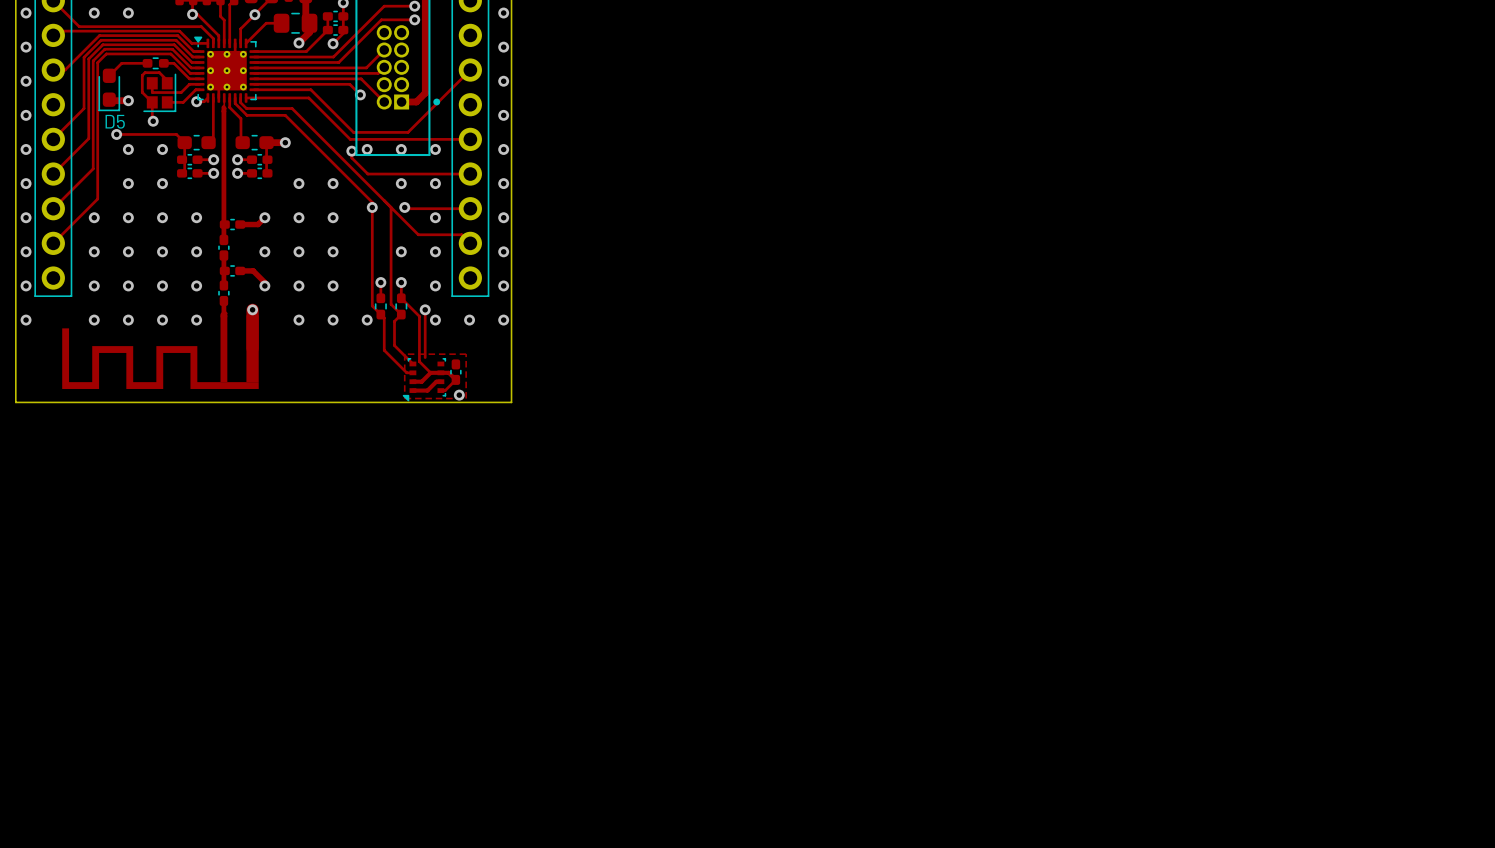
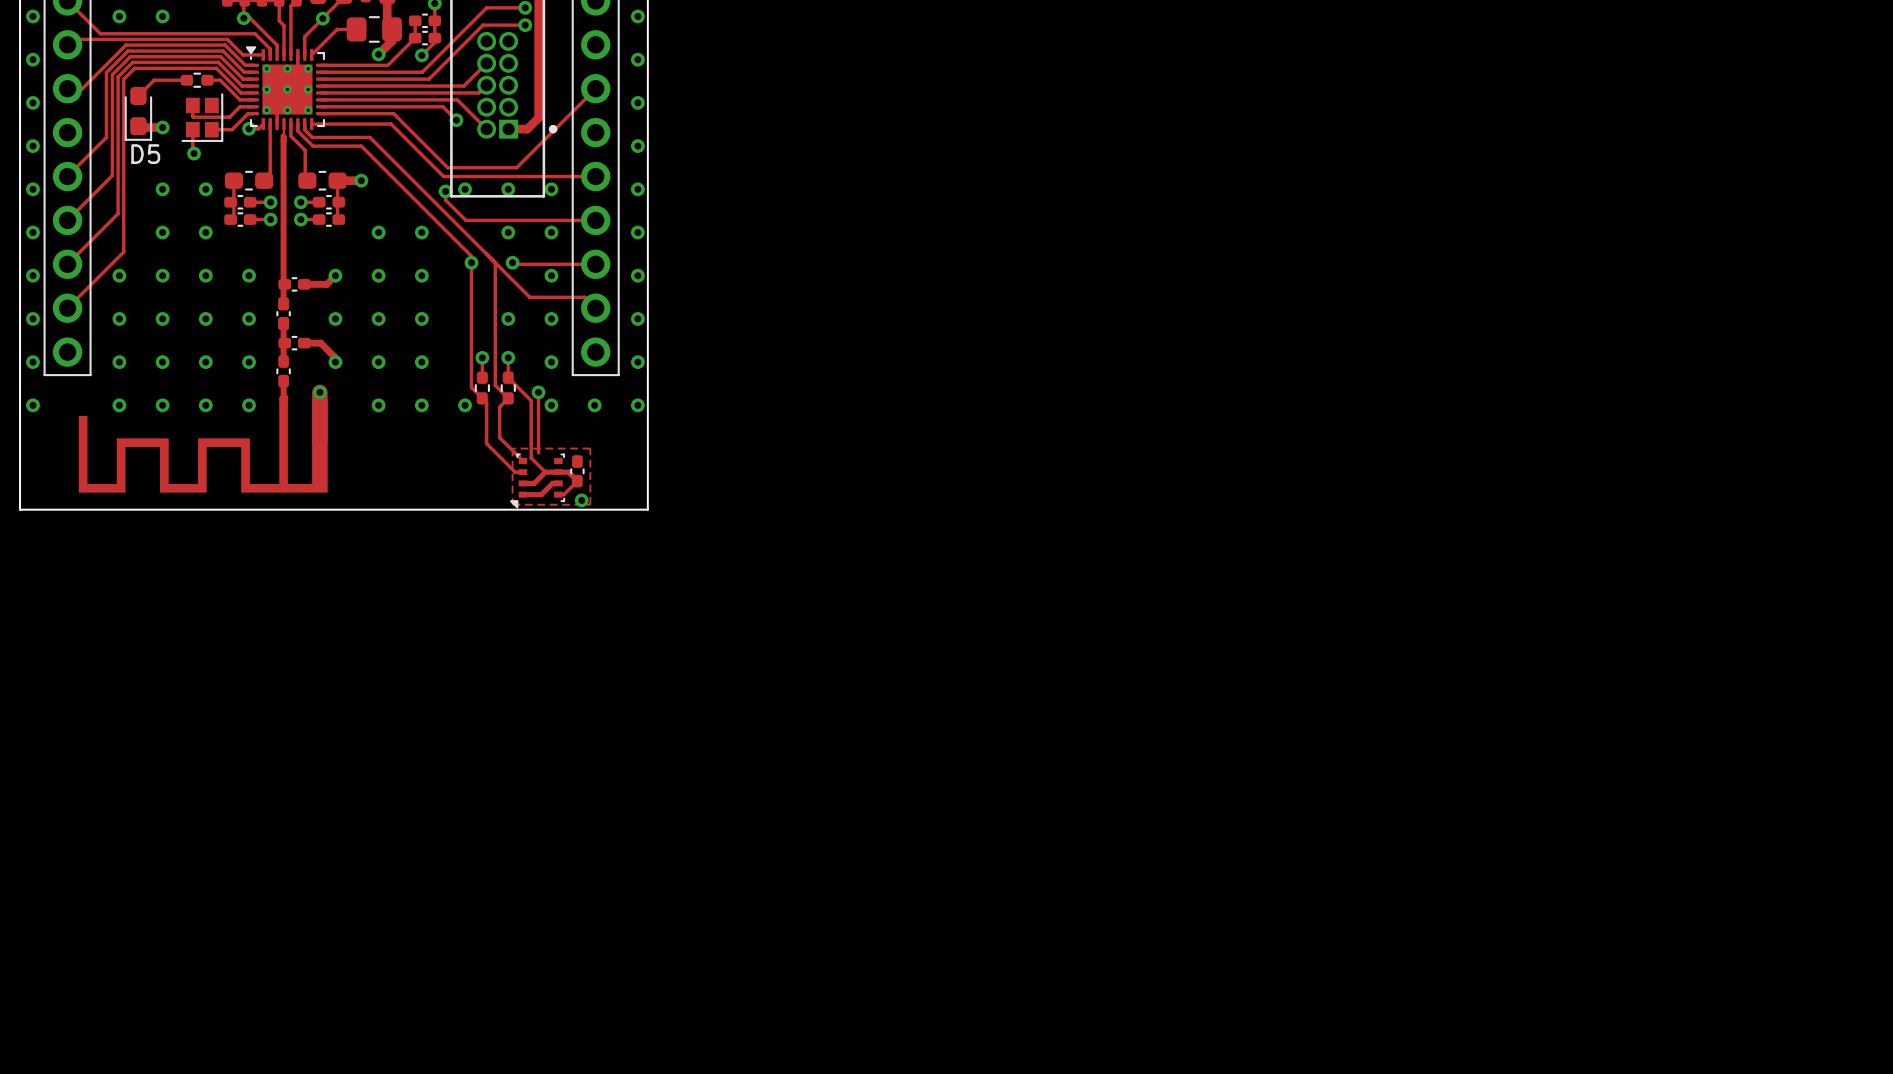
track: (167, 80) (159, 72) (145, 72) (142, 75) (142, 92) (152, 102) -> none
track: (116, 134) (176, 134) (184, 142) -> none
via: (116, 134) -> none

